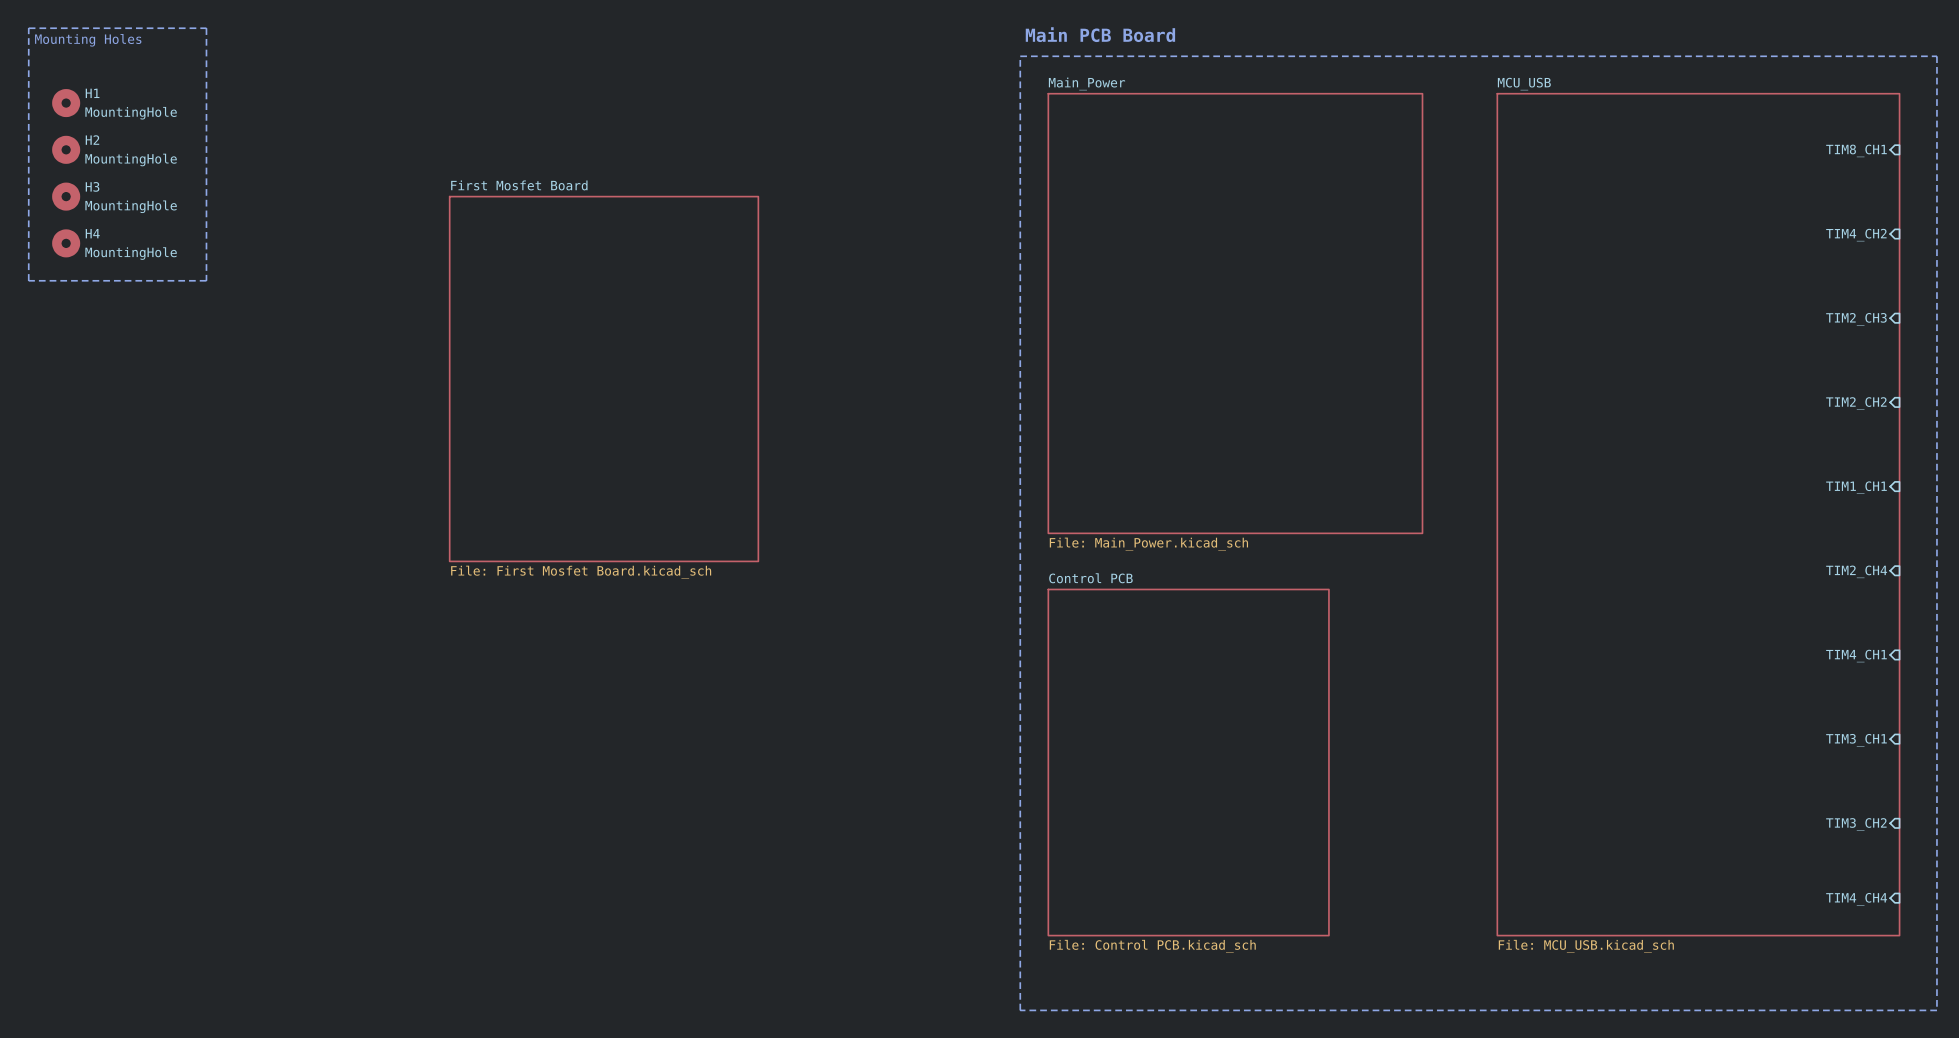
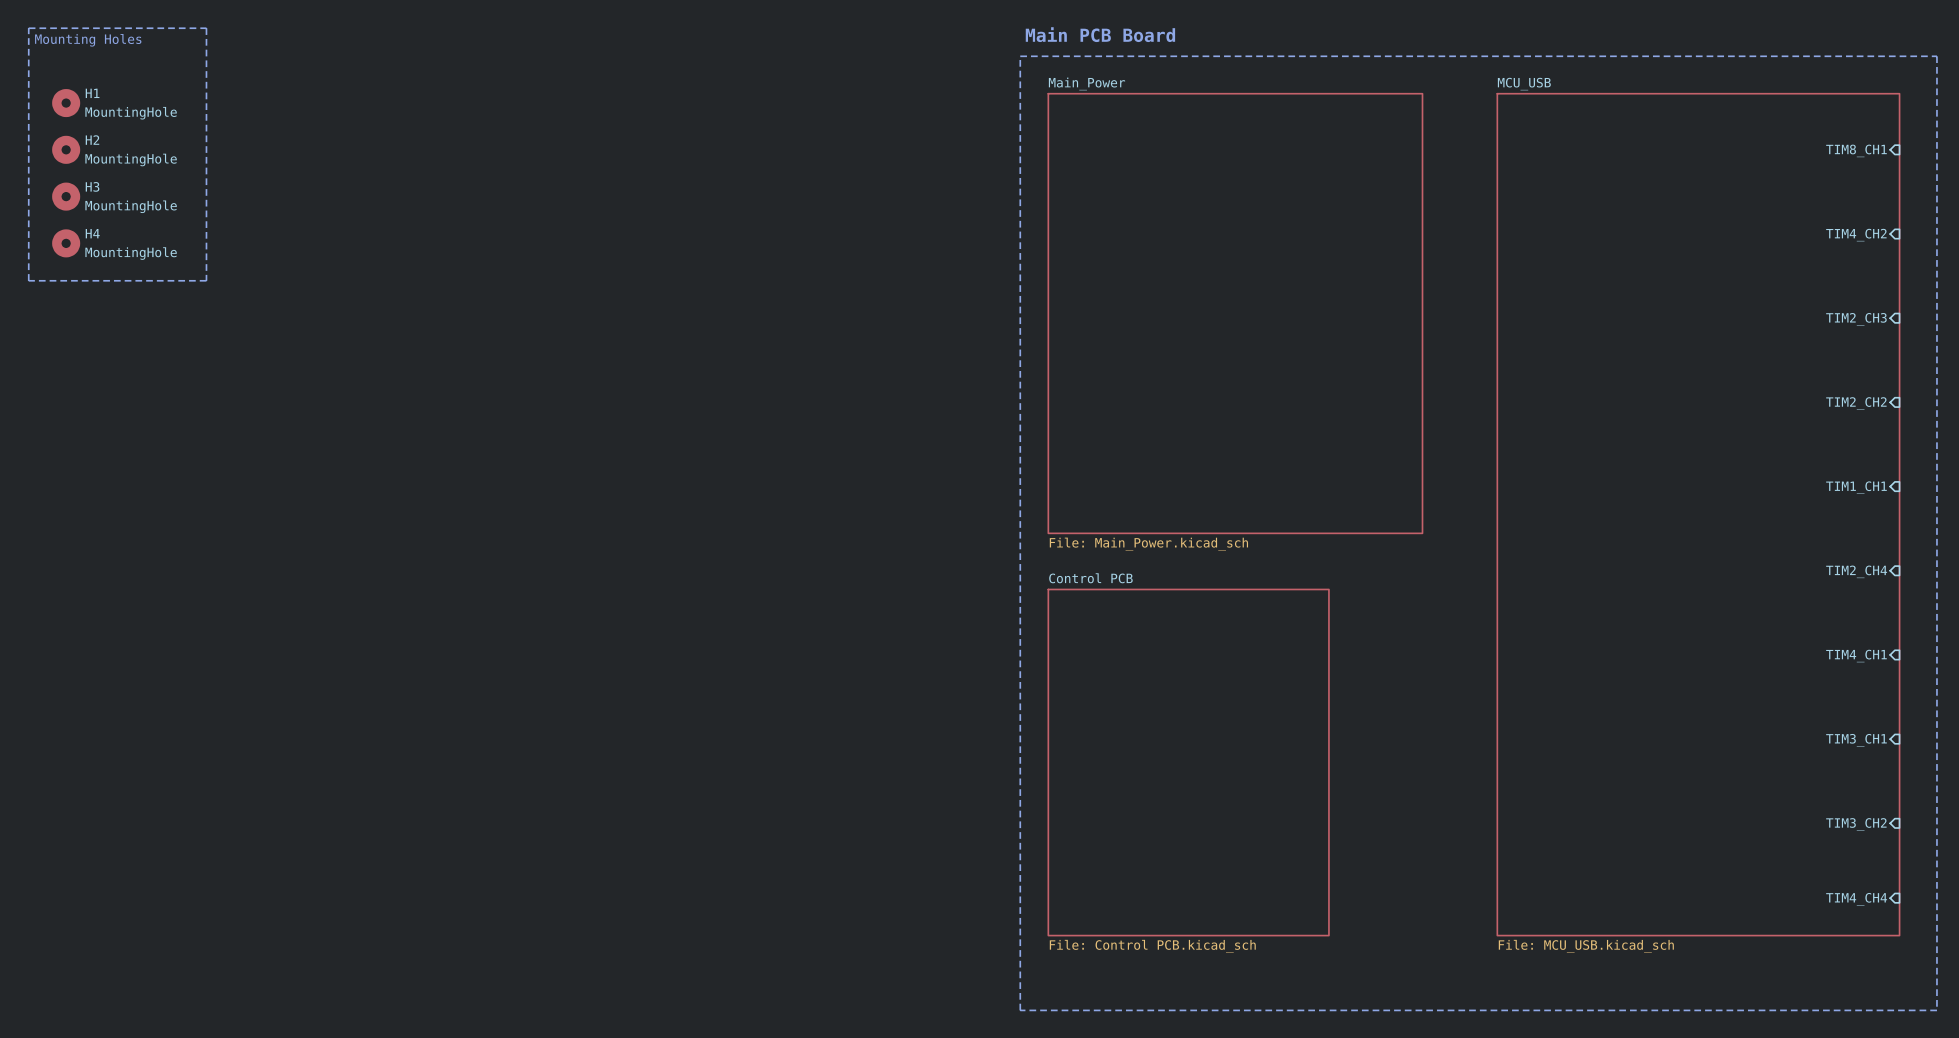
sheet First Mosfet Board: File: First Mosfet Board.kicad_sch (604, 379) -> none

